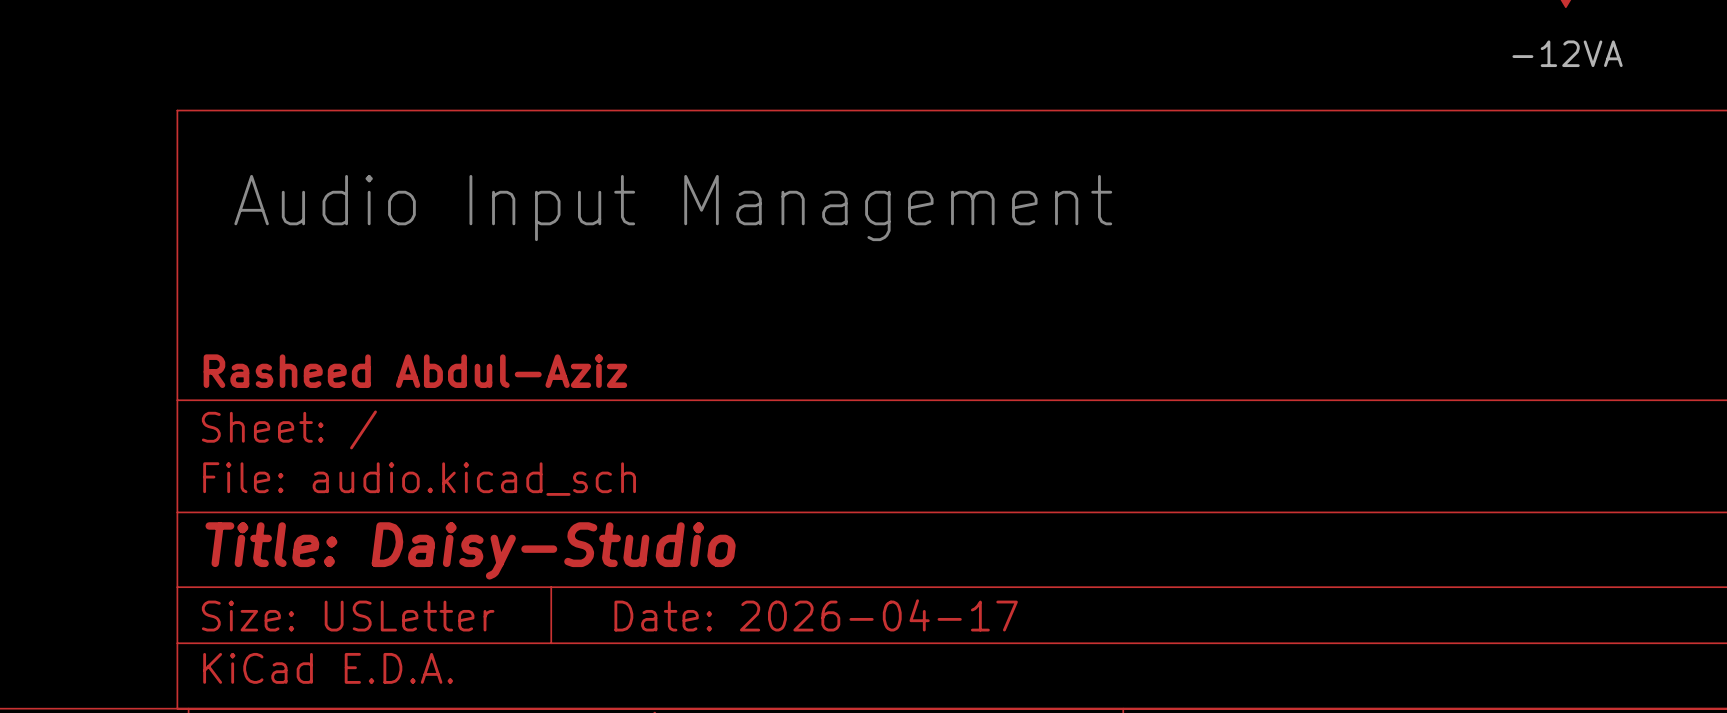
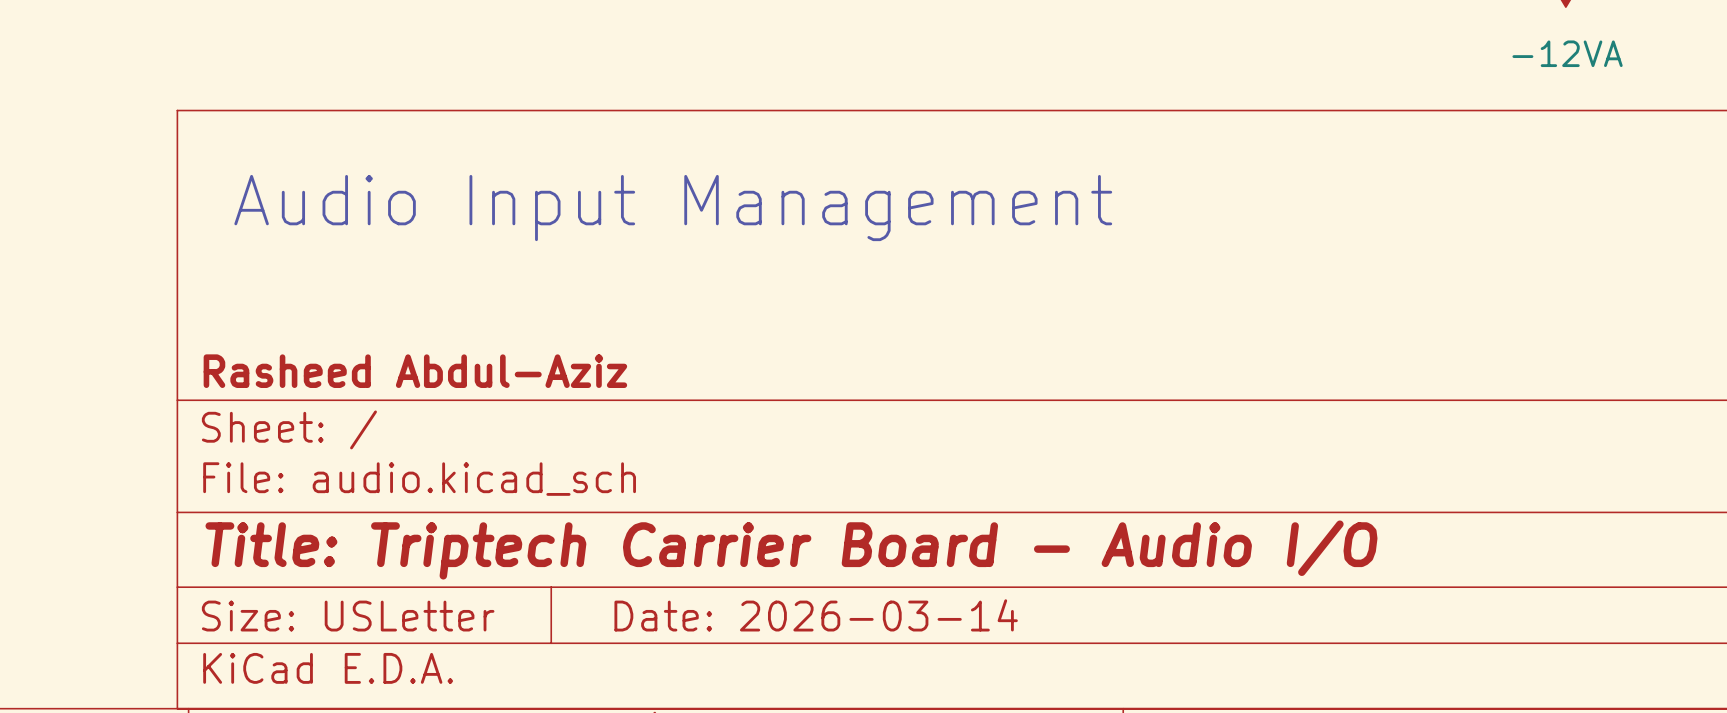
title block: Title: Daisy-Studio (470, 550) -> Title: Triptech Carrier Board - Audio I/O (791, 550)
title block: Date: 2026-04-17 (816, 615) -> Date: 2026-03-14 (816, 615)

